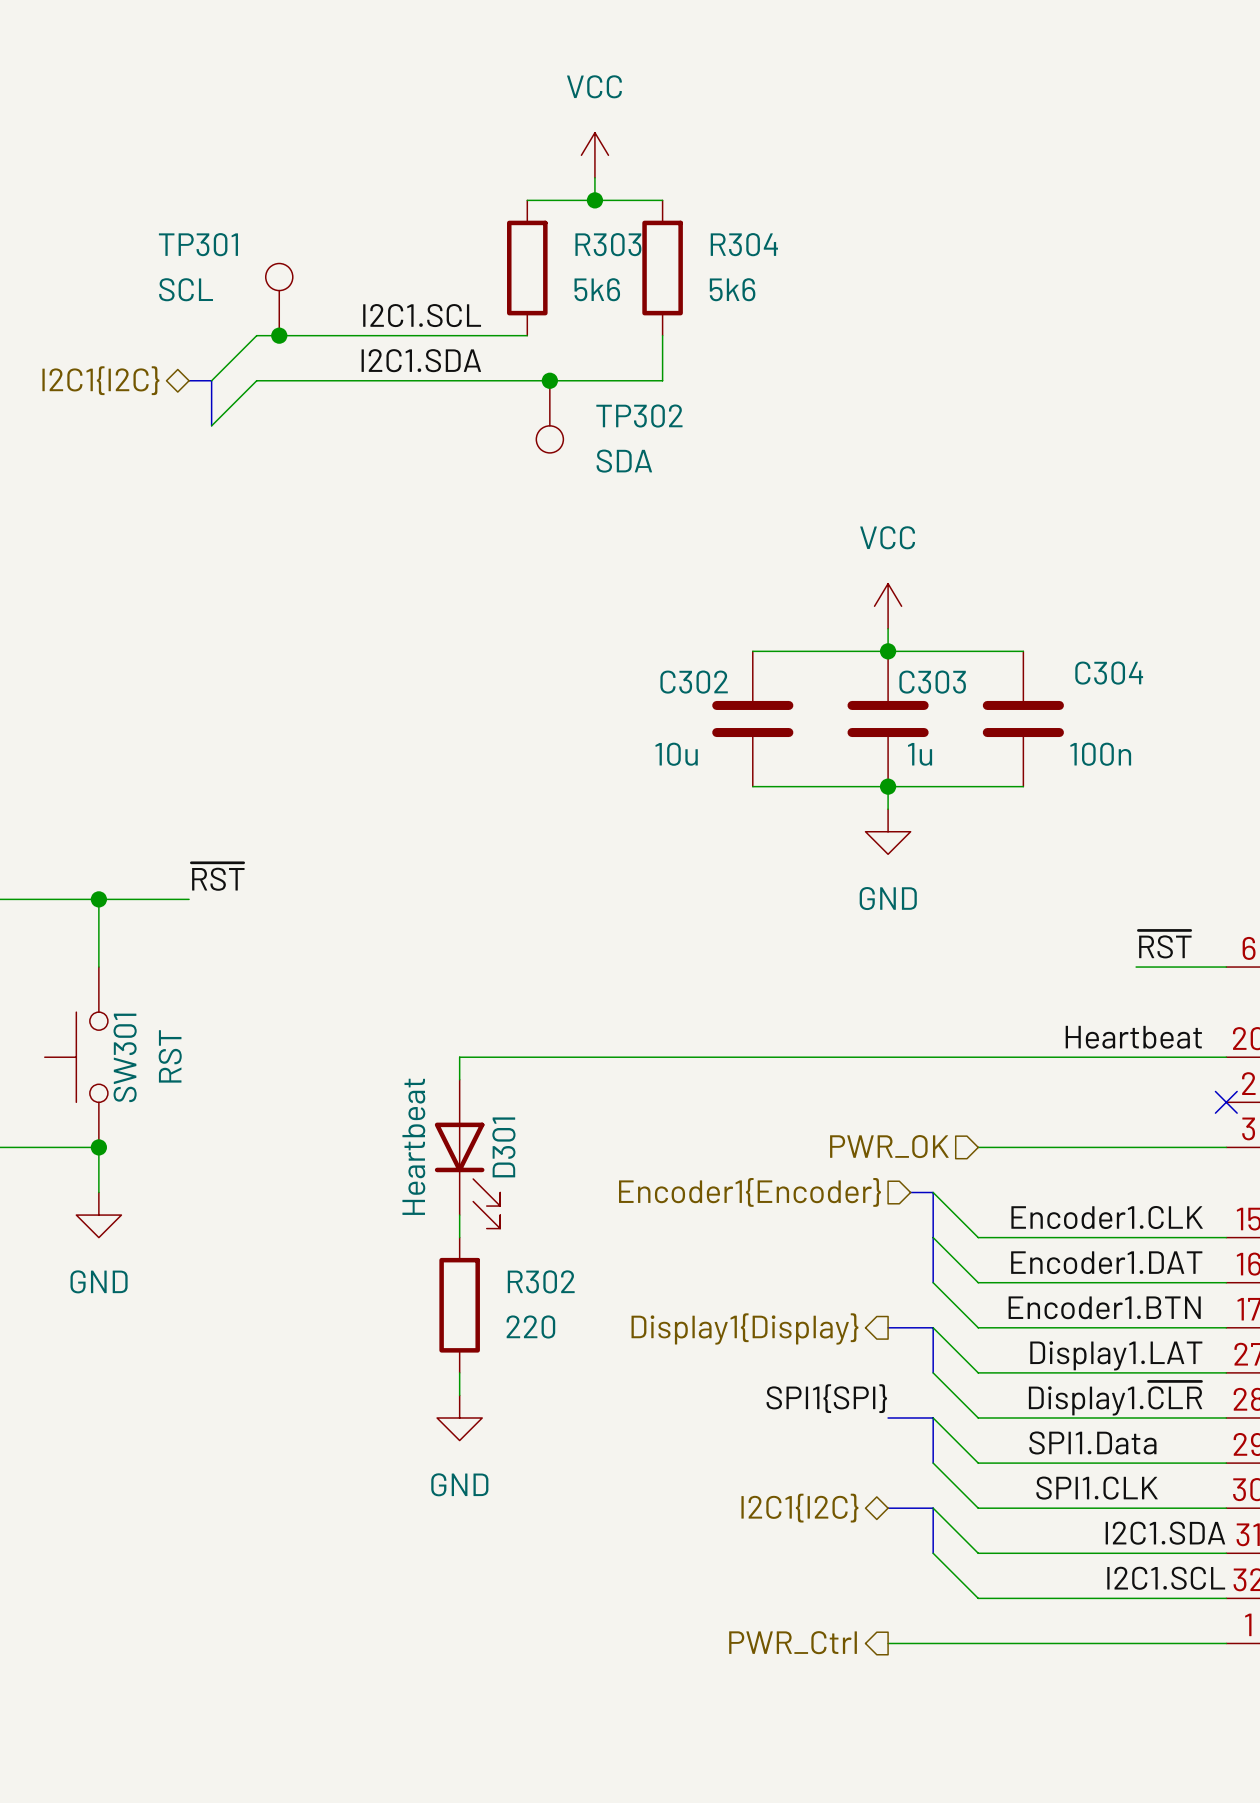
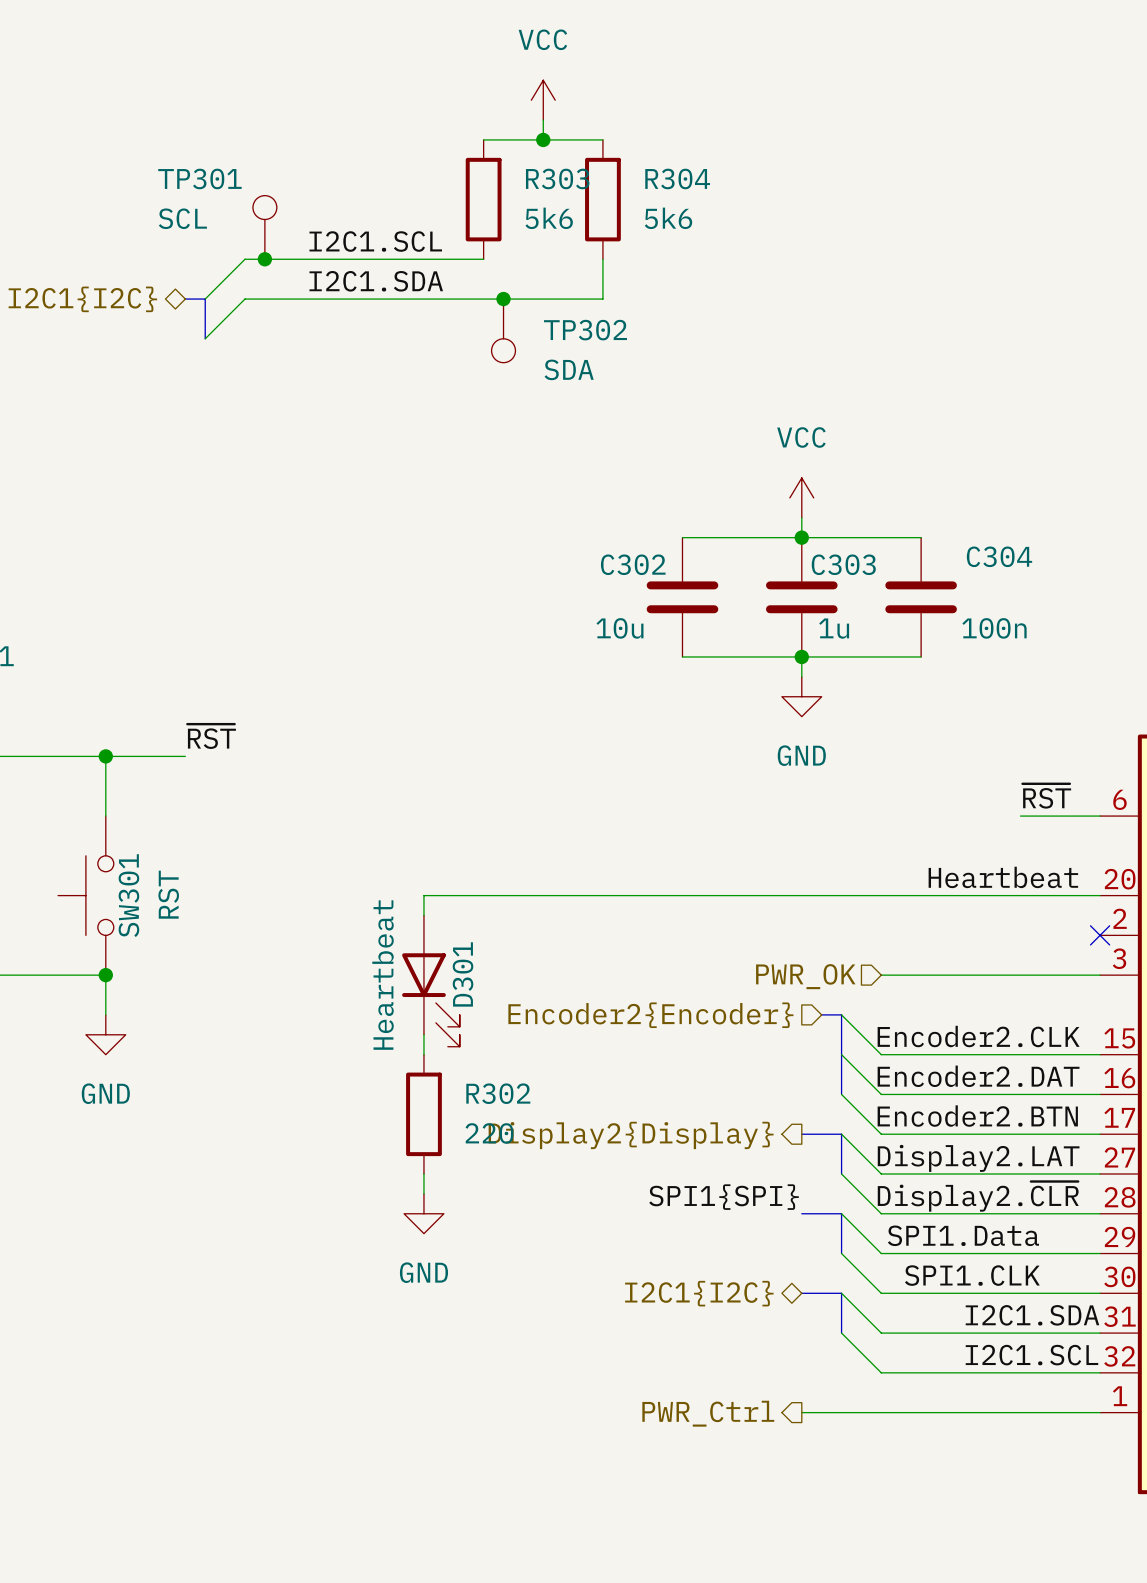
hierarchical label: Encoder1{Encoder} (749, 1192) -> Encoder2{Encoder} (650, 1015)
label: Encoder1.CLK (1107, 1217) -> Encoder2.CLK (978, 1036)
label: Encoder1.DAT (1106, 1262) -> Encoder2.DAT (978, 1076)
label: Encoder1.BTN (1104, 1307) -> Encoder2.BTN (977, 1116)
hierarchical label: Display1{Display} (744, 1328) -> Display2{Display} (631, 1135)
label: Display1.LAT (1116, 1355) -> Display2.LAT (978, 1158)
label: Display1.~{CLR} (1115, 1398) -> Display2.~{CLR} (978, 1196)

